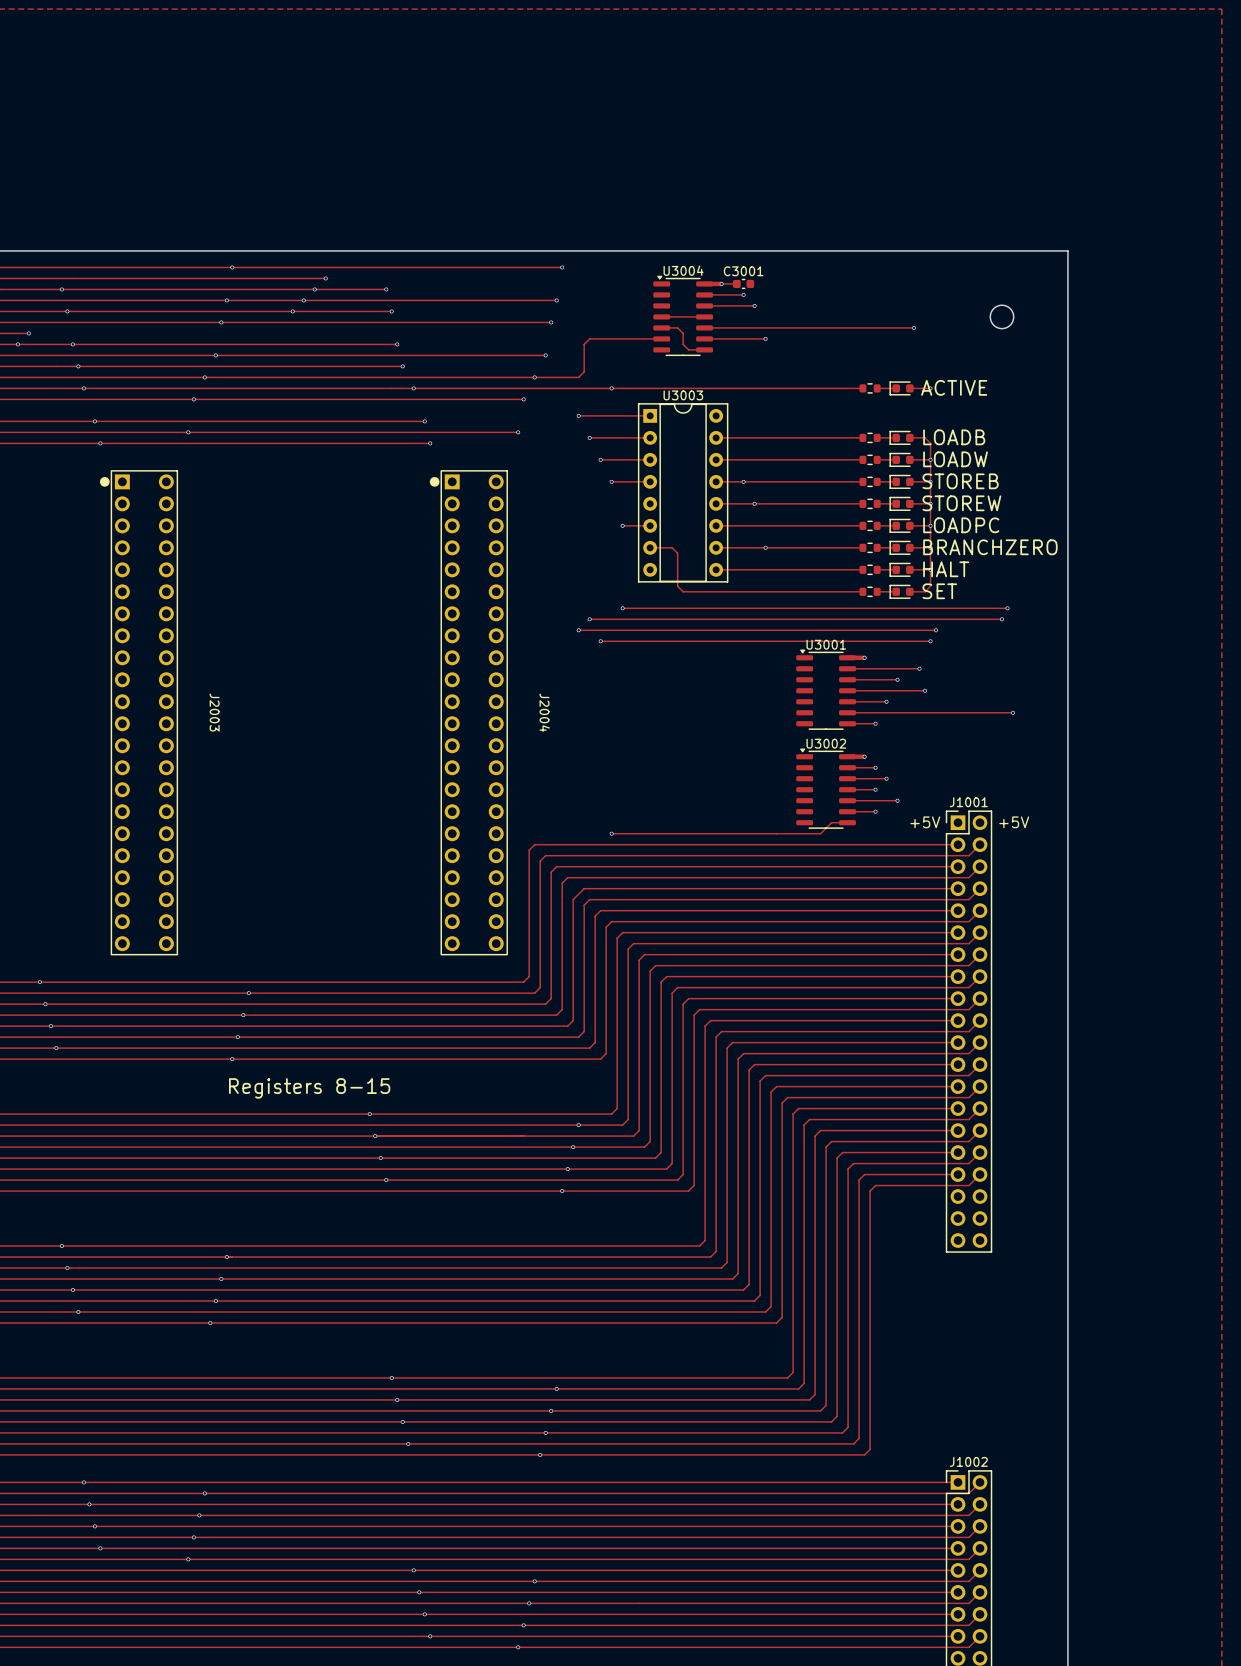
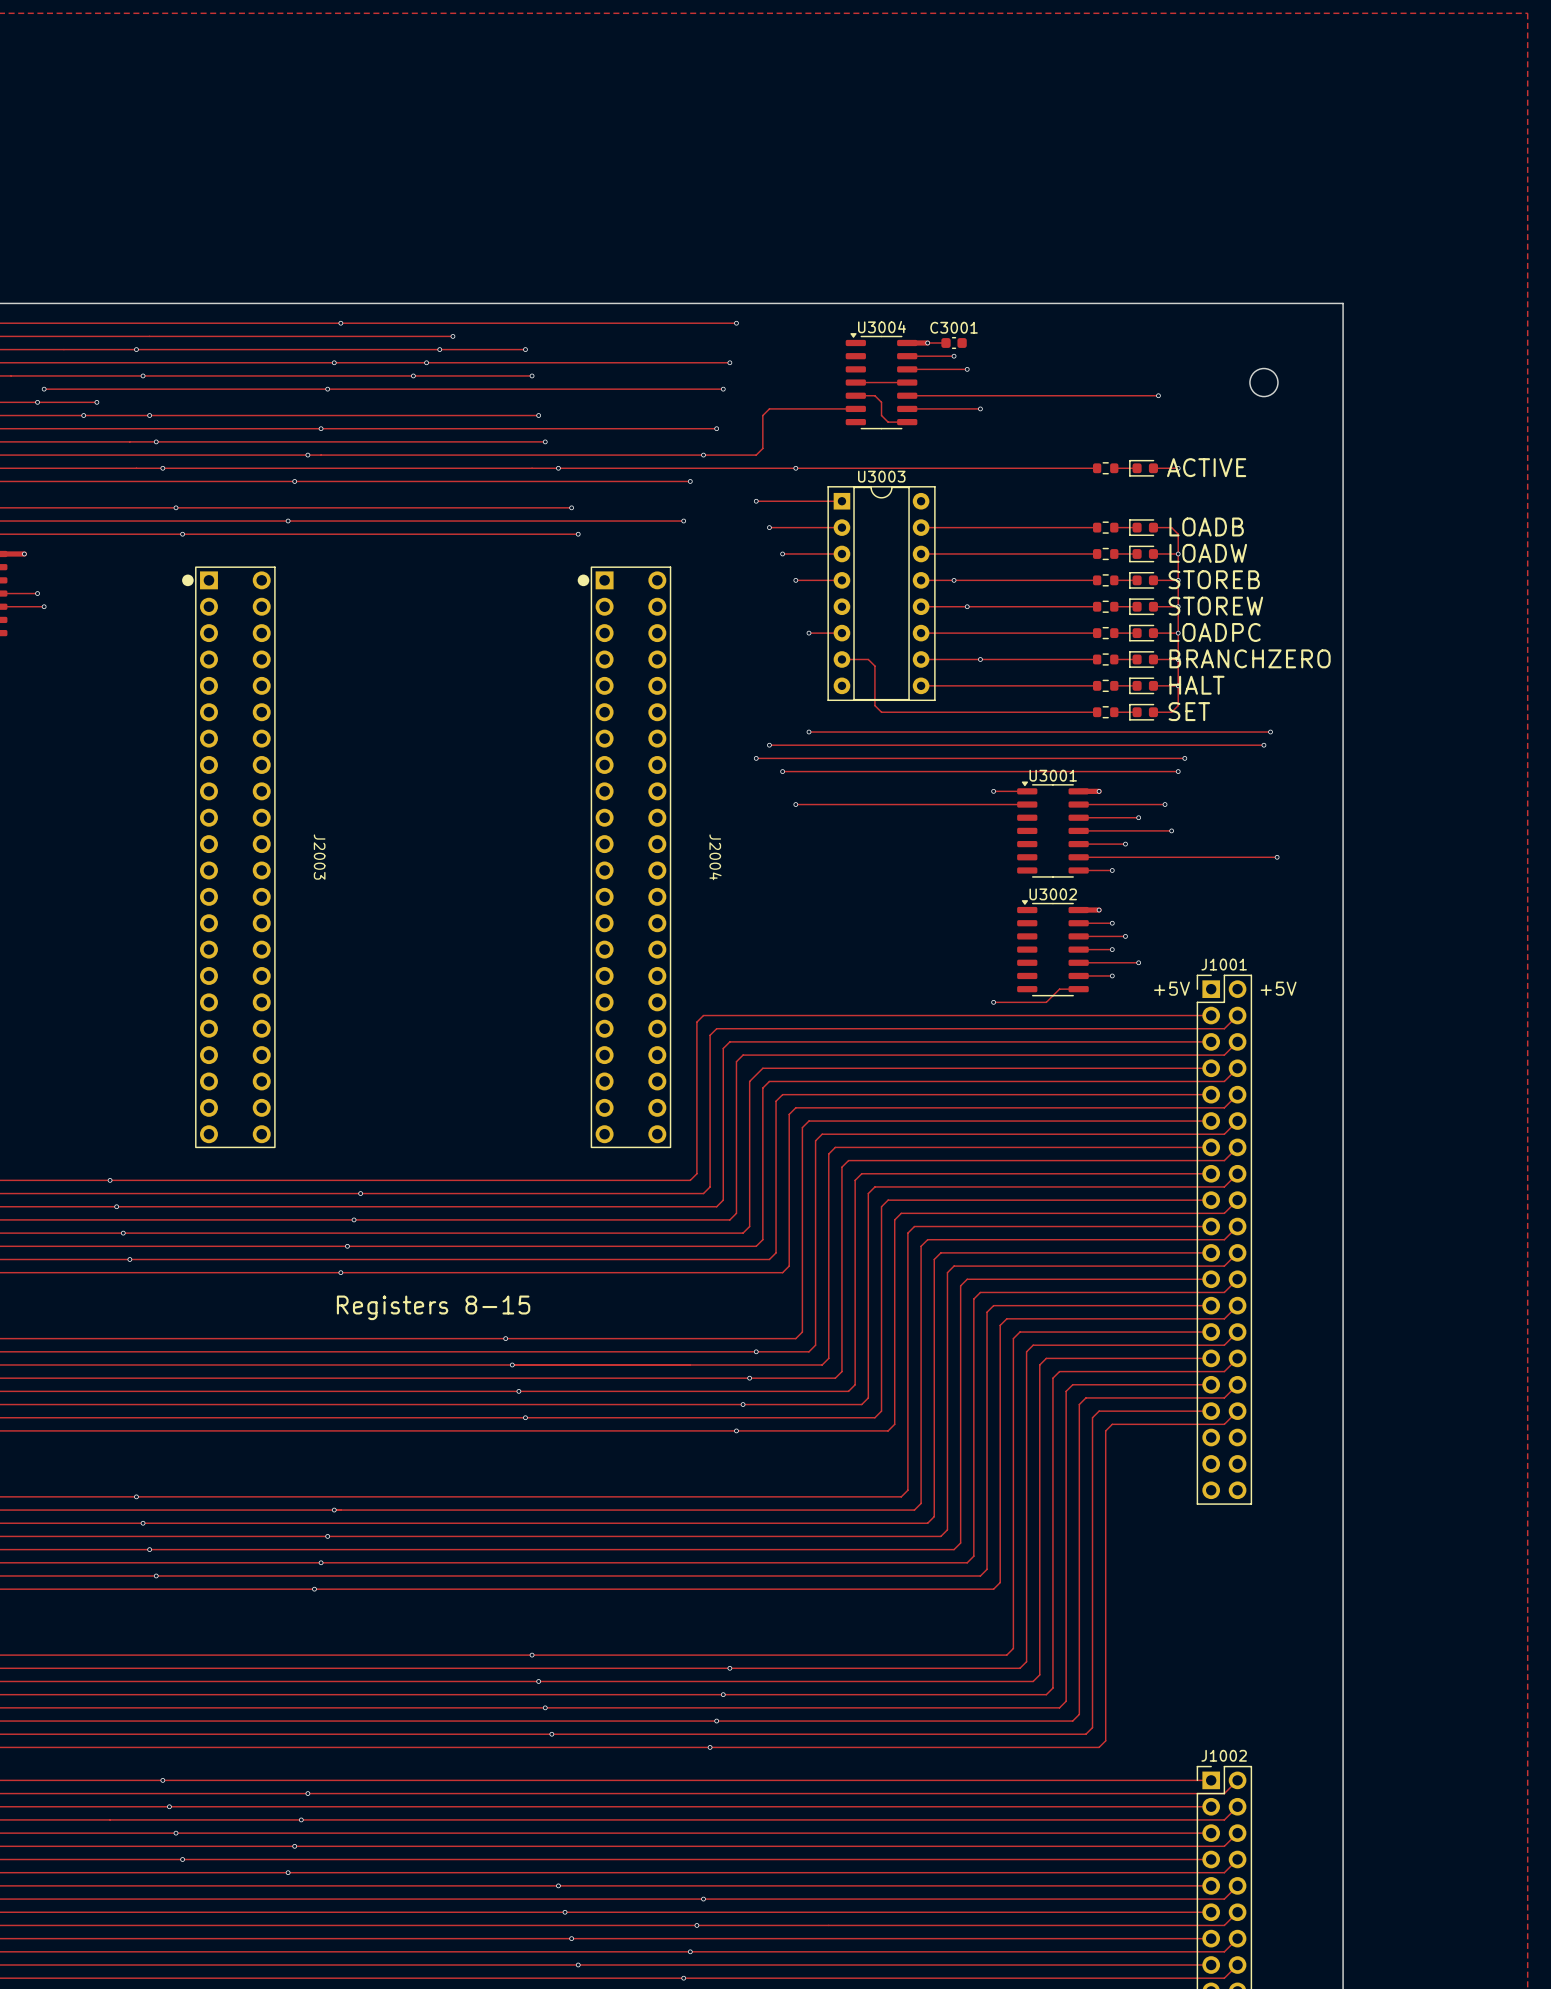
track: none -> (993, 791) (1027, 791)
via: none -> (993, 791)
track: none -> (795, 804) (1027, 804)
via: none -> (795, 804)
track: (611, 833) (776, 833) -> none
via: (611, 833) -> none
via: none -> (993, 1002)

